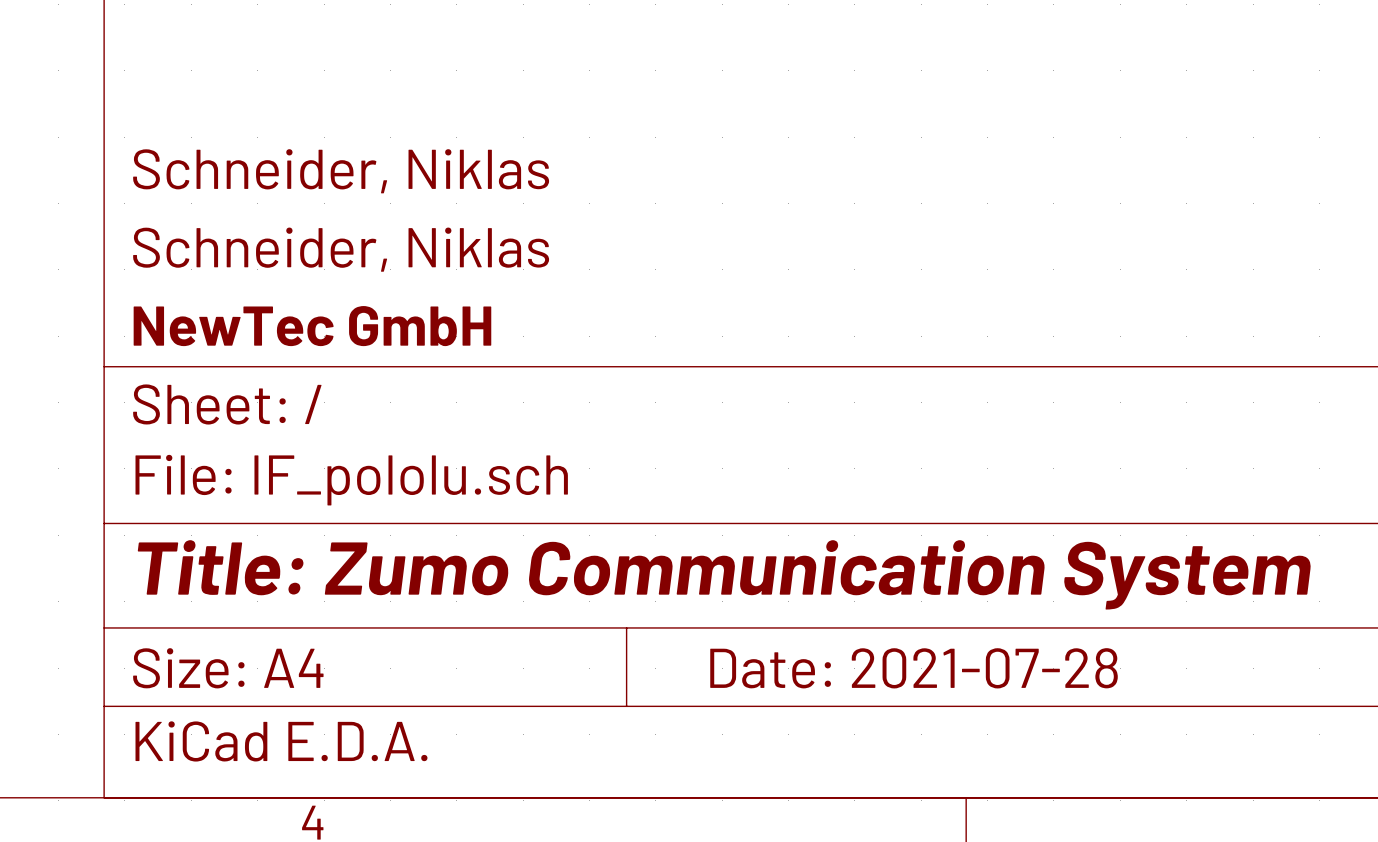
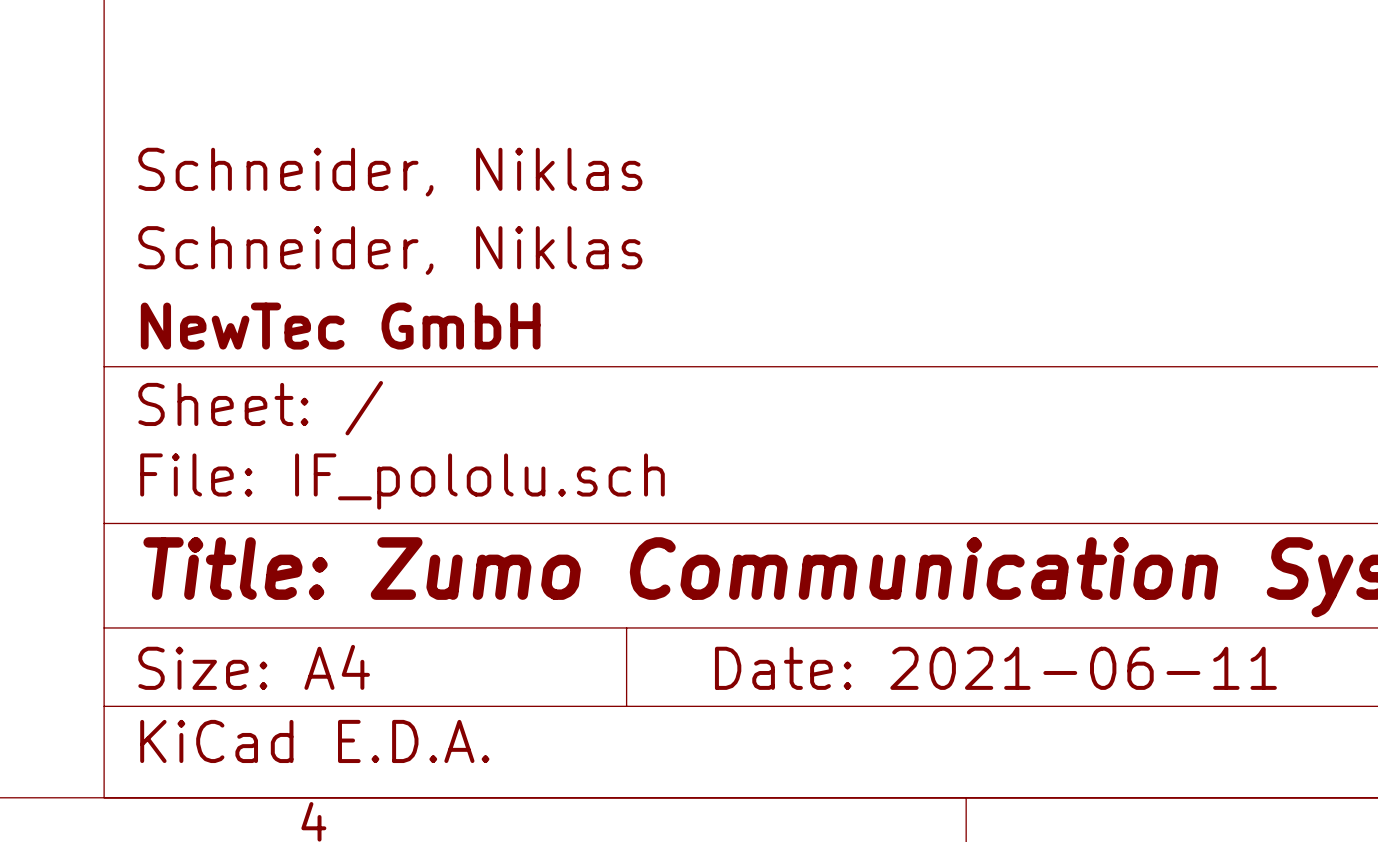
title block: Date: 2021-07-28 (914, 668) -> Date: 2021-06-11 (995, 668)

